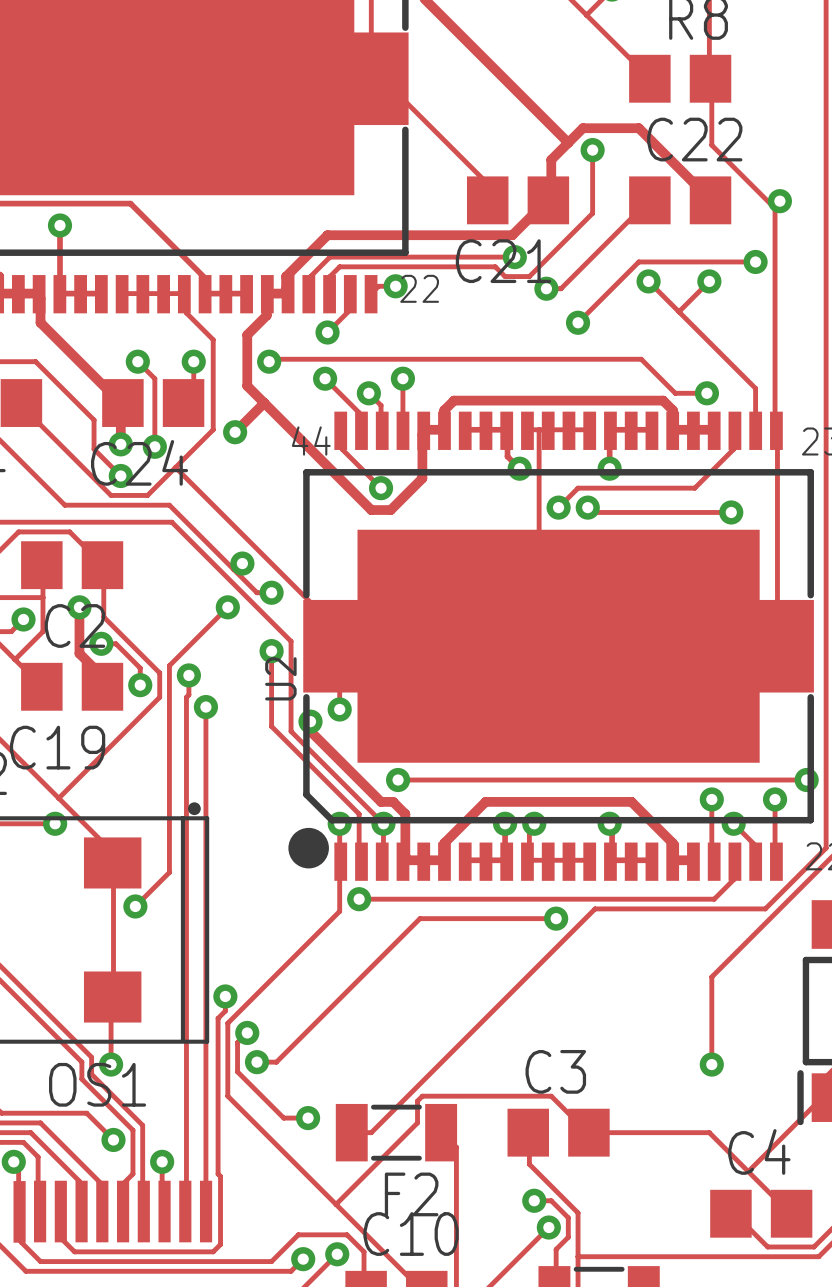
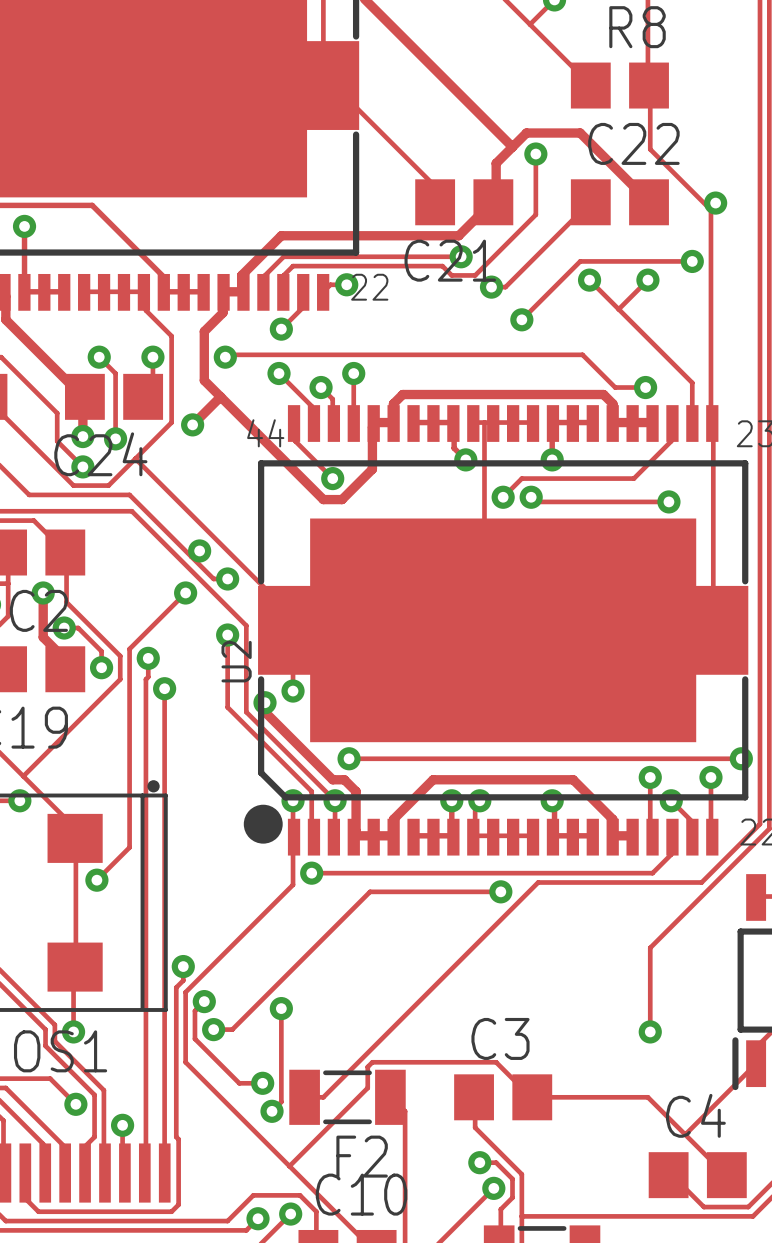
track: none -> (281, 1008) (281, 1101) (272, 1111)
via: none -> (281, 1008)
via: none -> (272, 1111)

